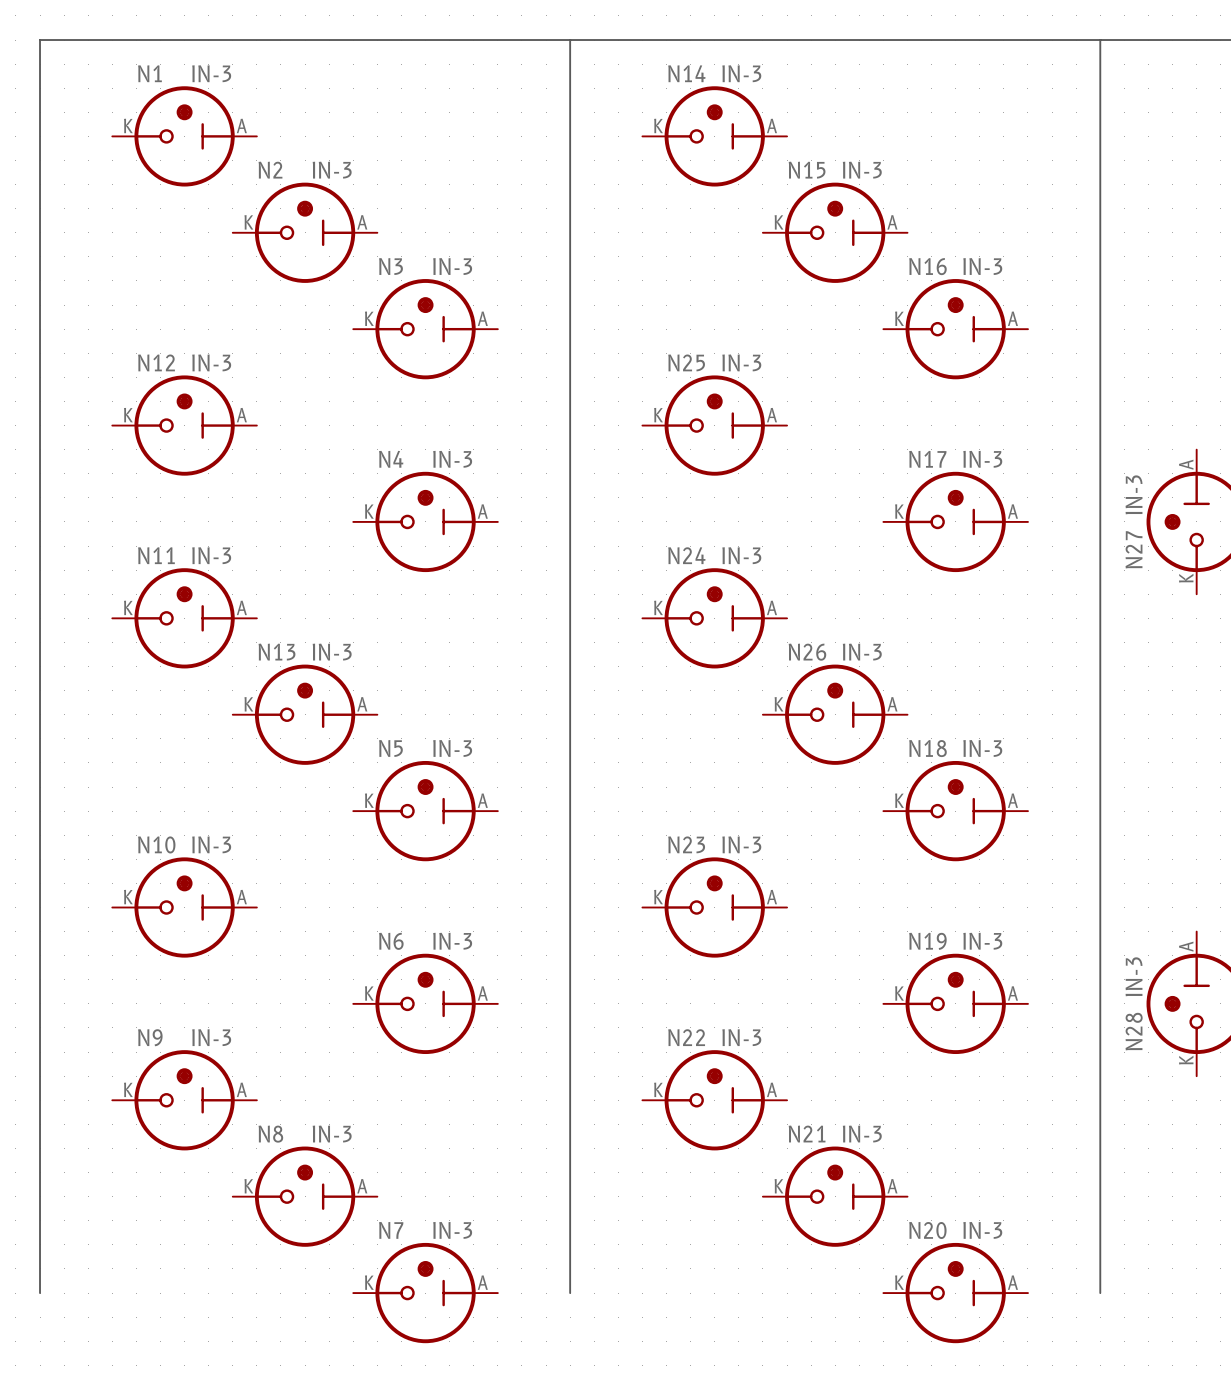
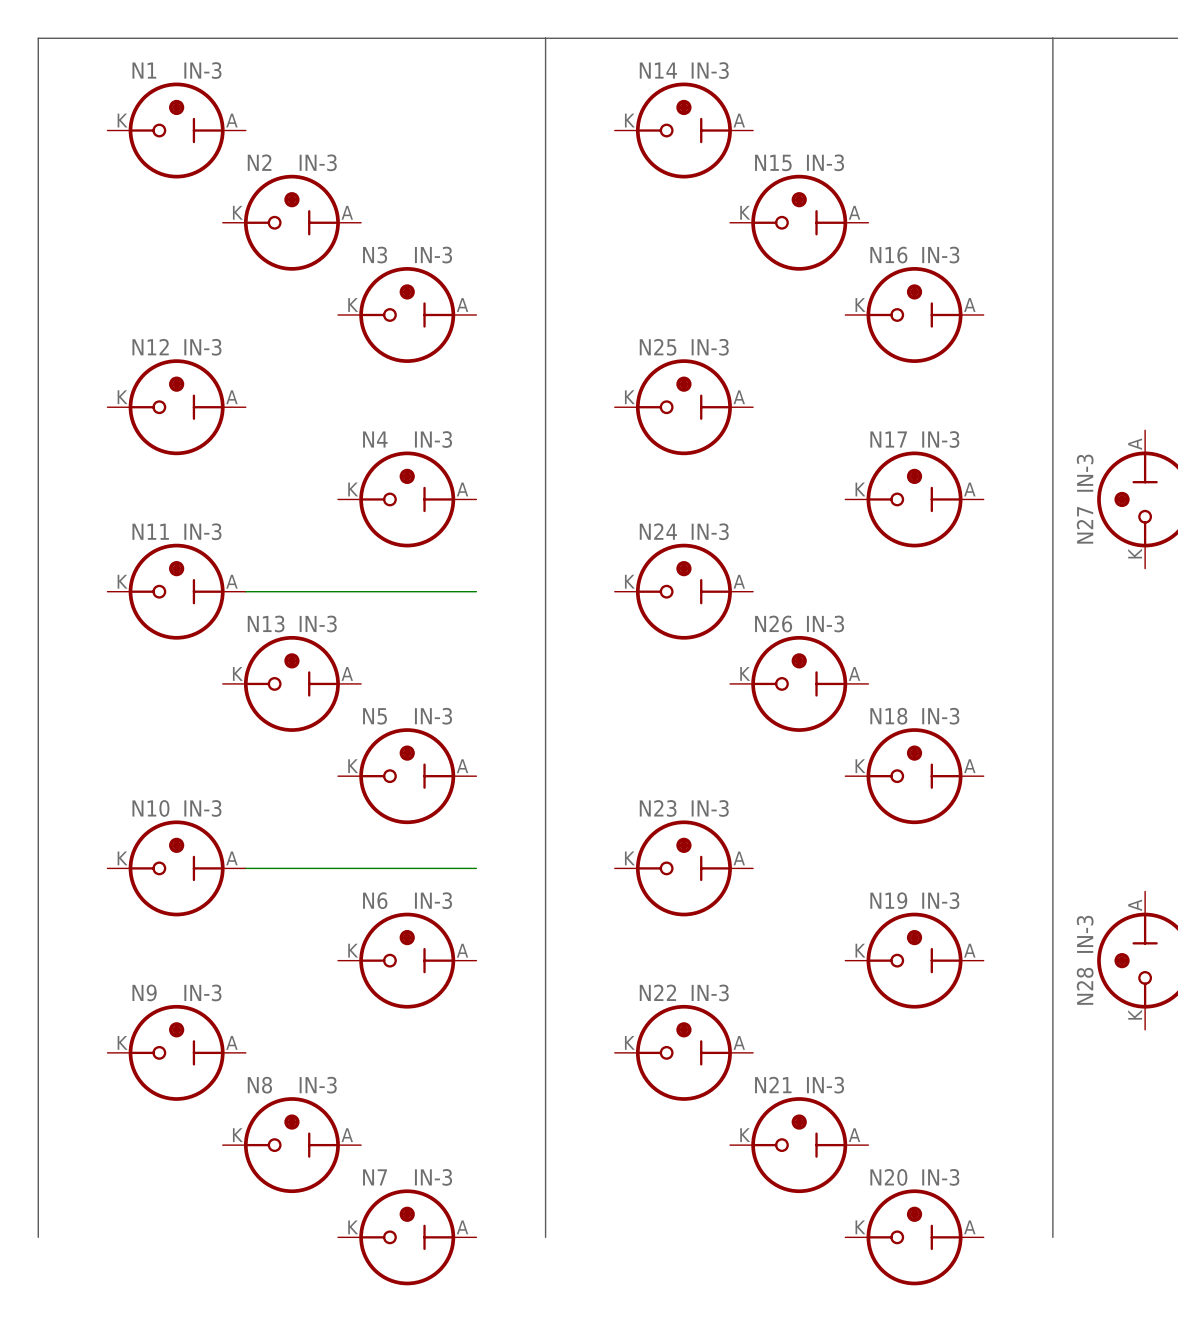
wire: none -> (245, 591) (476, 591)
wire: none -> (245, 868) (476, 868)

